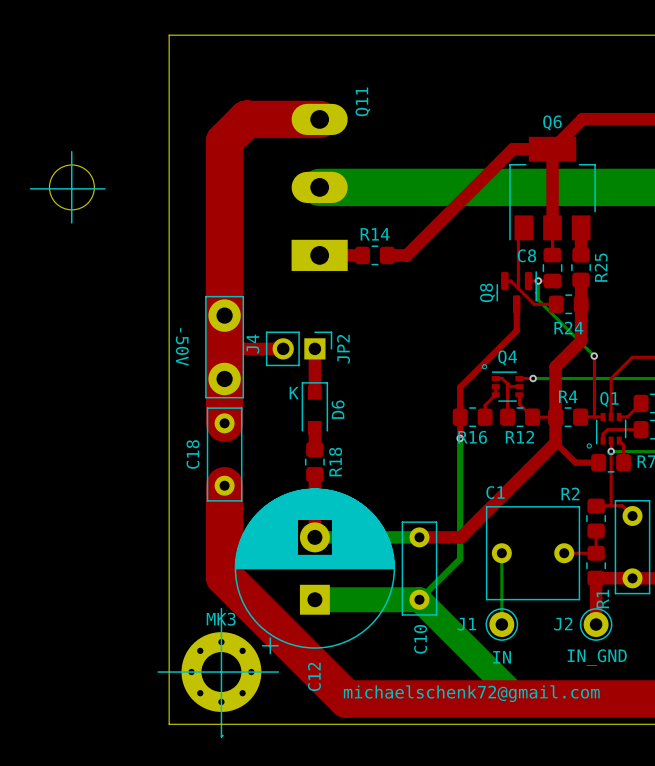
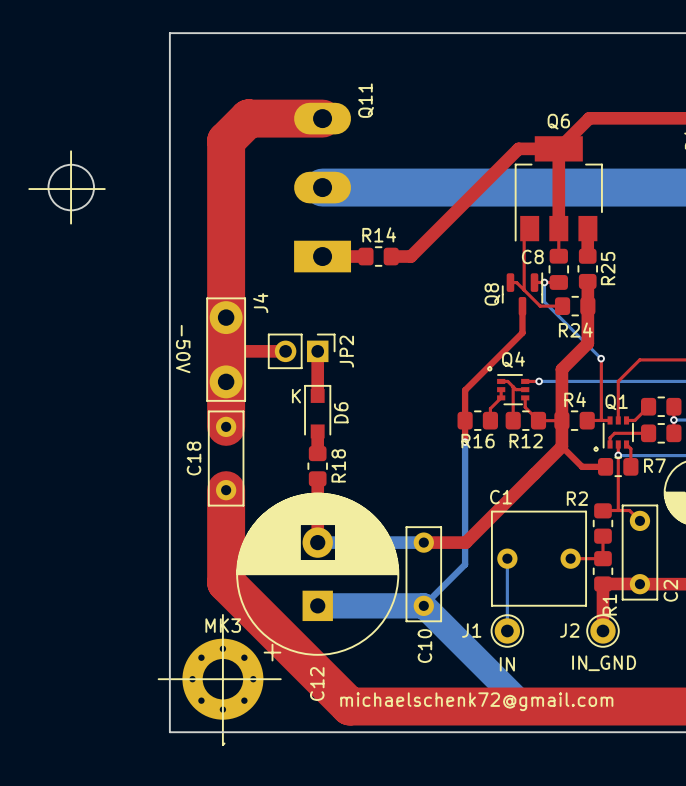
J4 name position: J4 (252, 343) -> J4 (260, 303)

